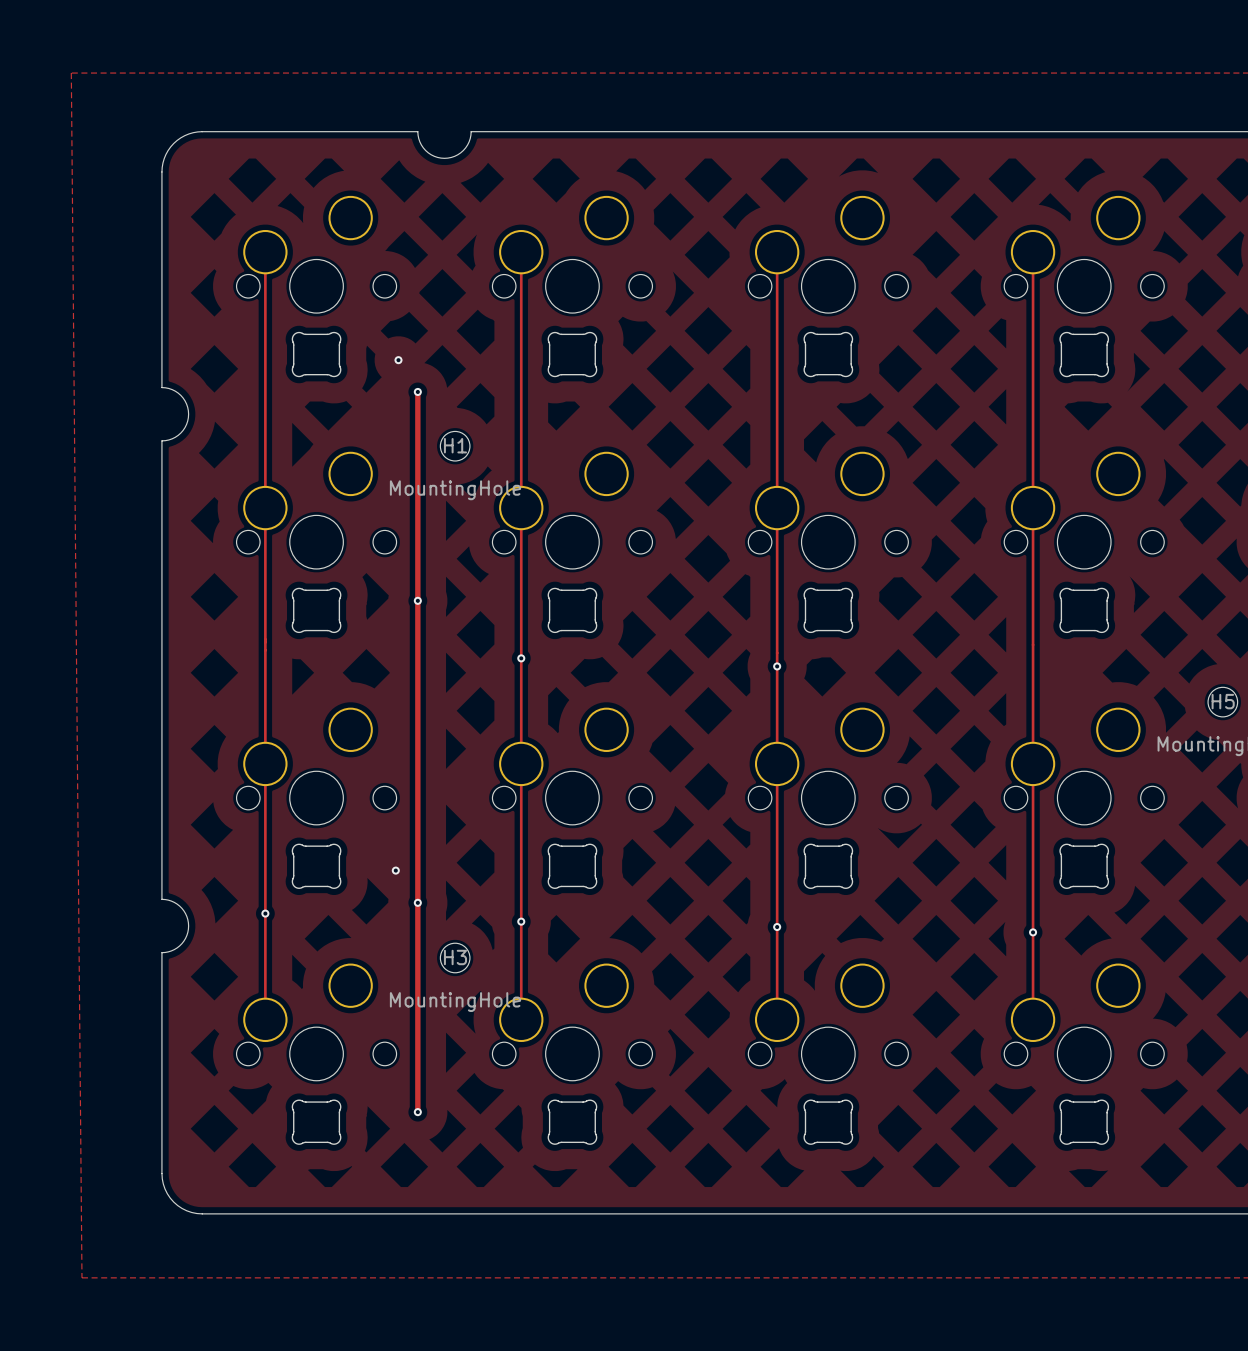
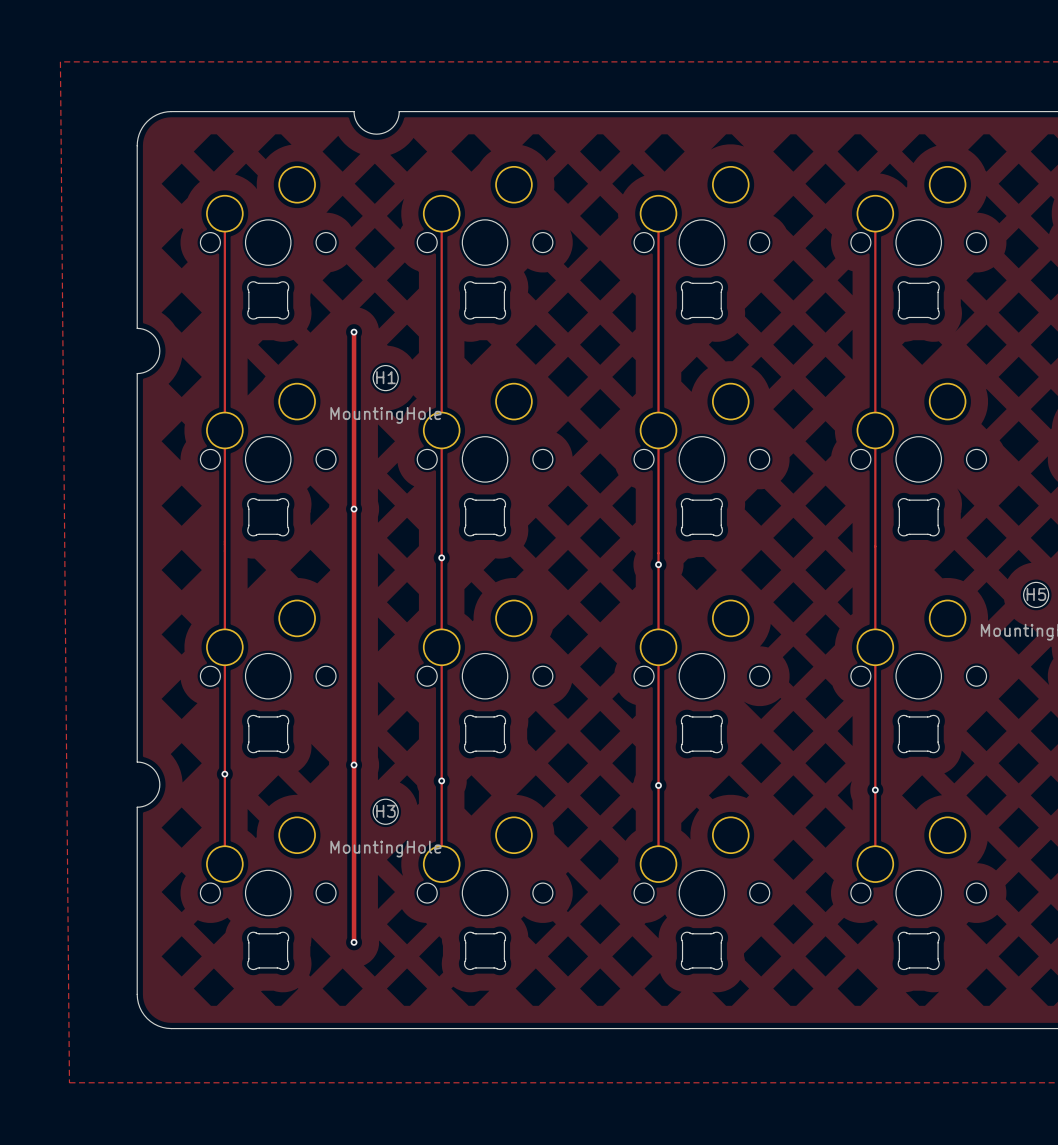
via: (398, 360) -> none
via: (395, 870) -> none

